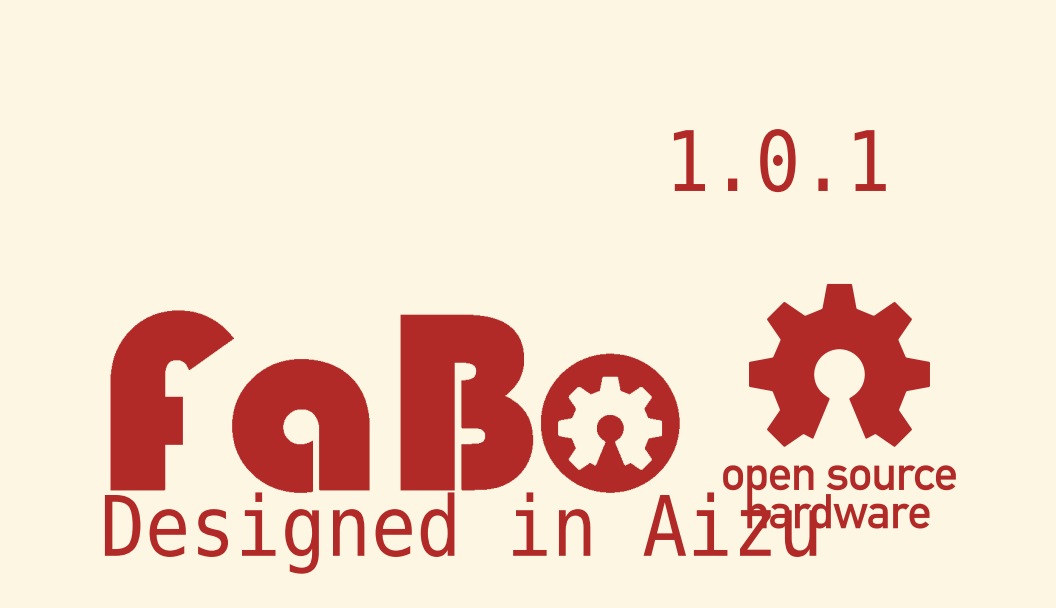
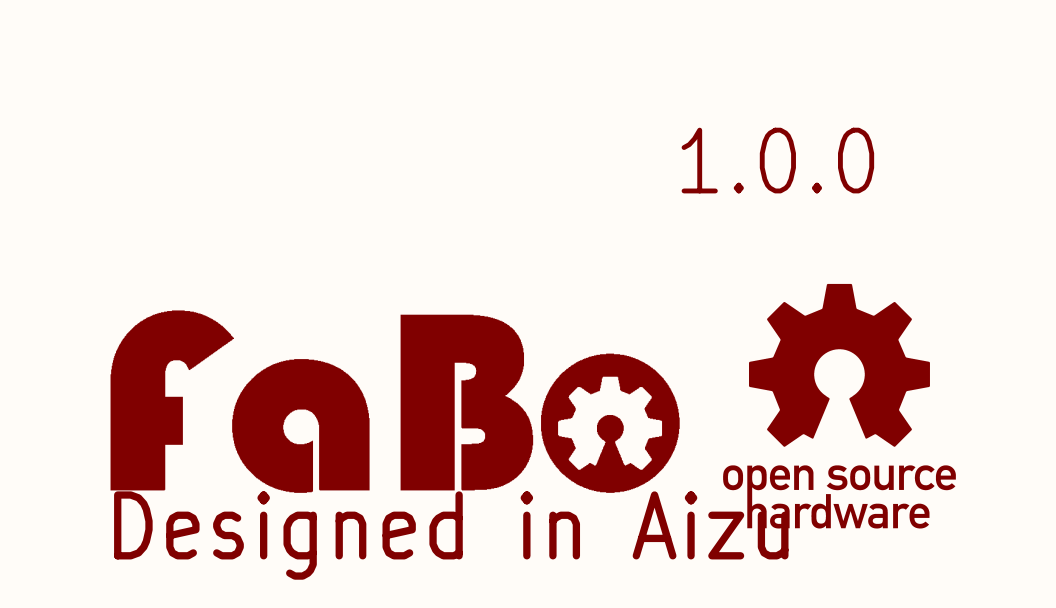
text: 1.0.1 (779, 160) -> 1.0.0 (777, 160)

